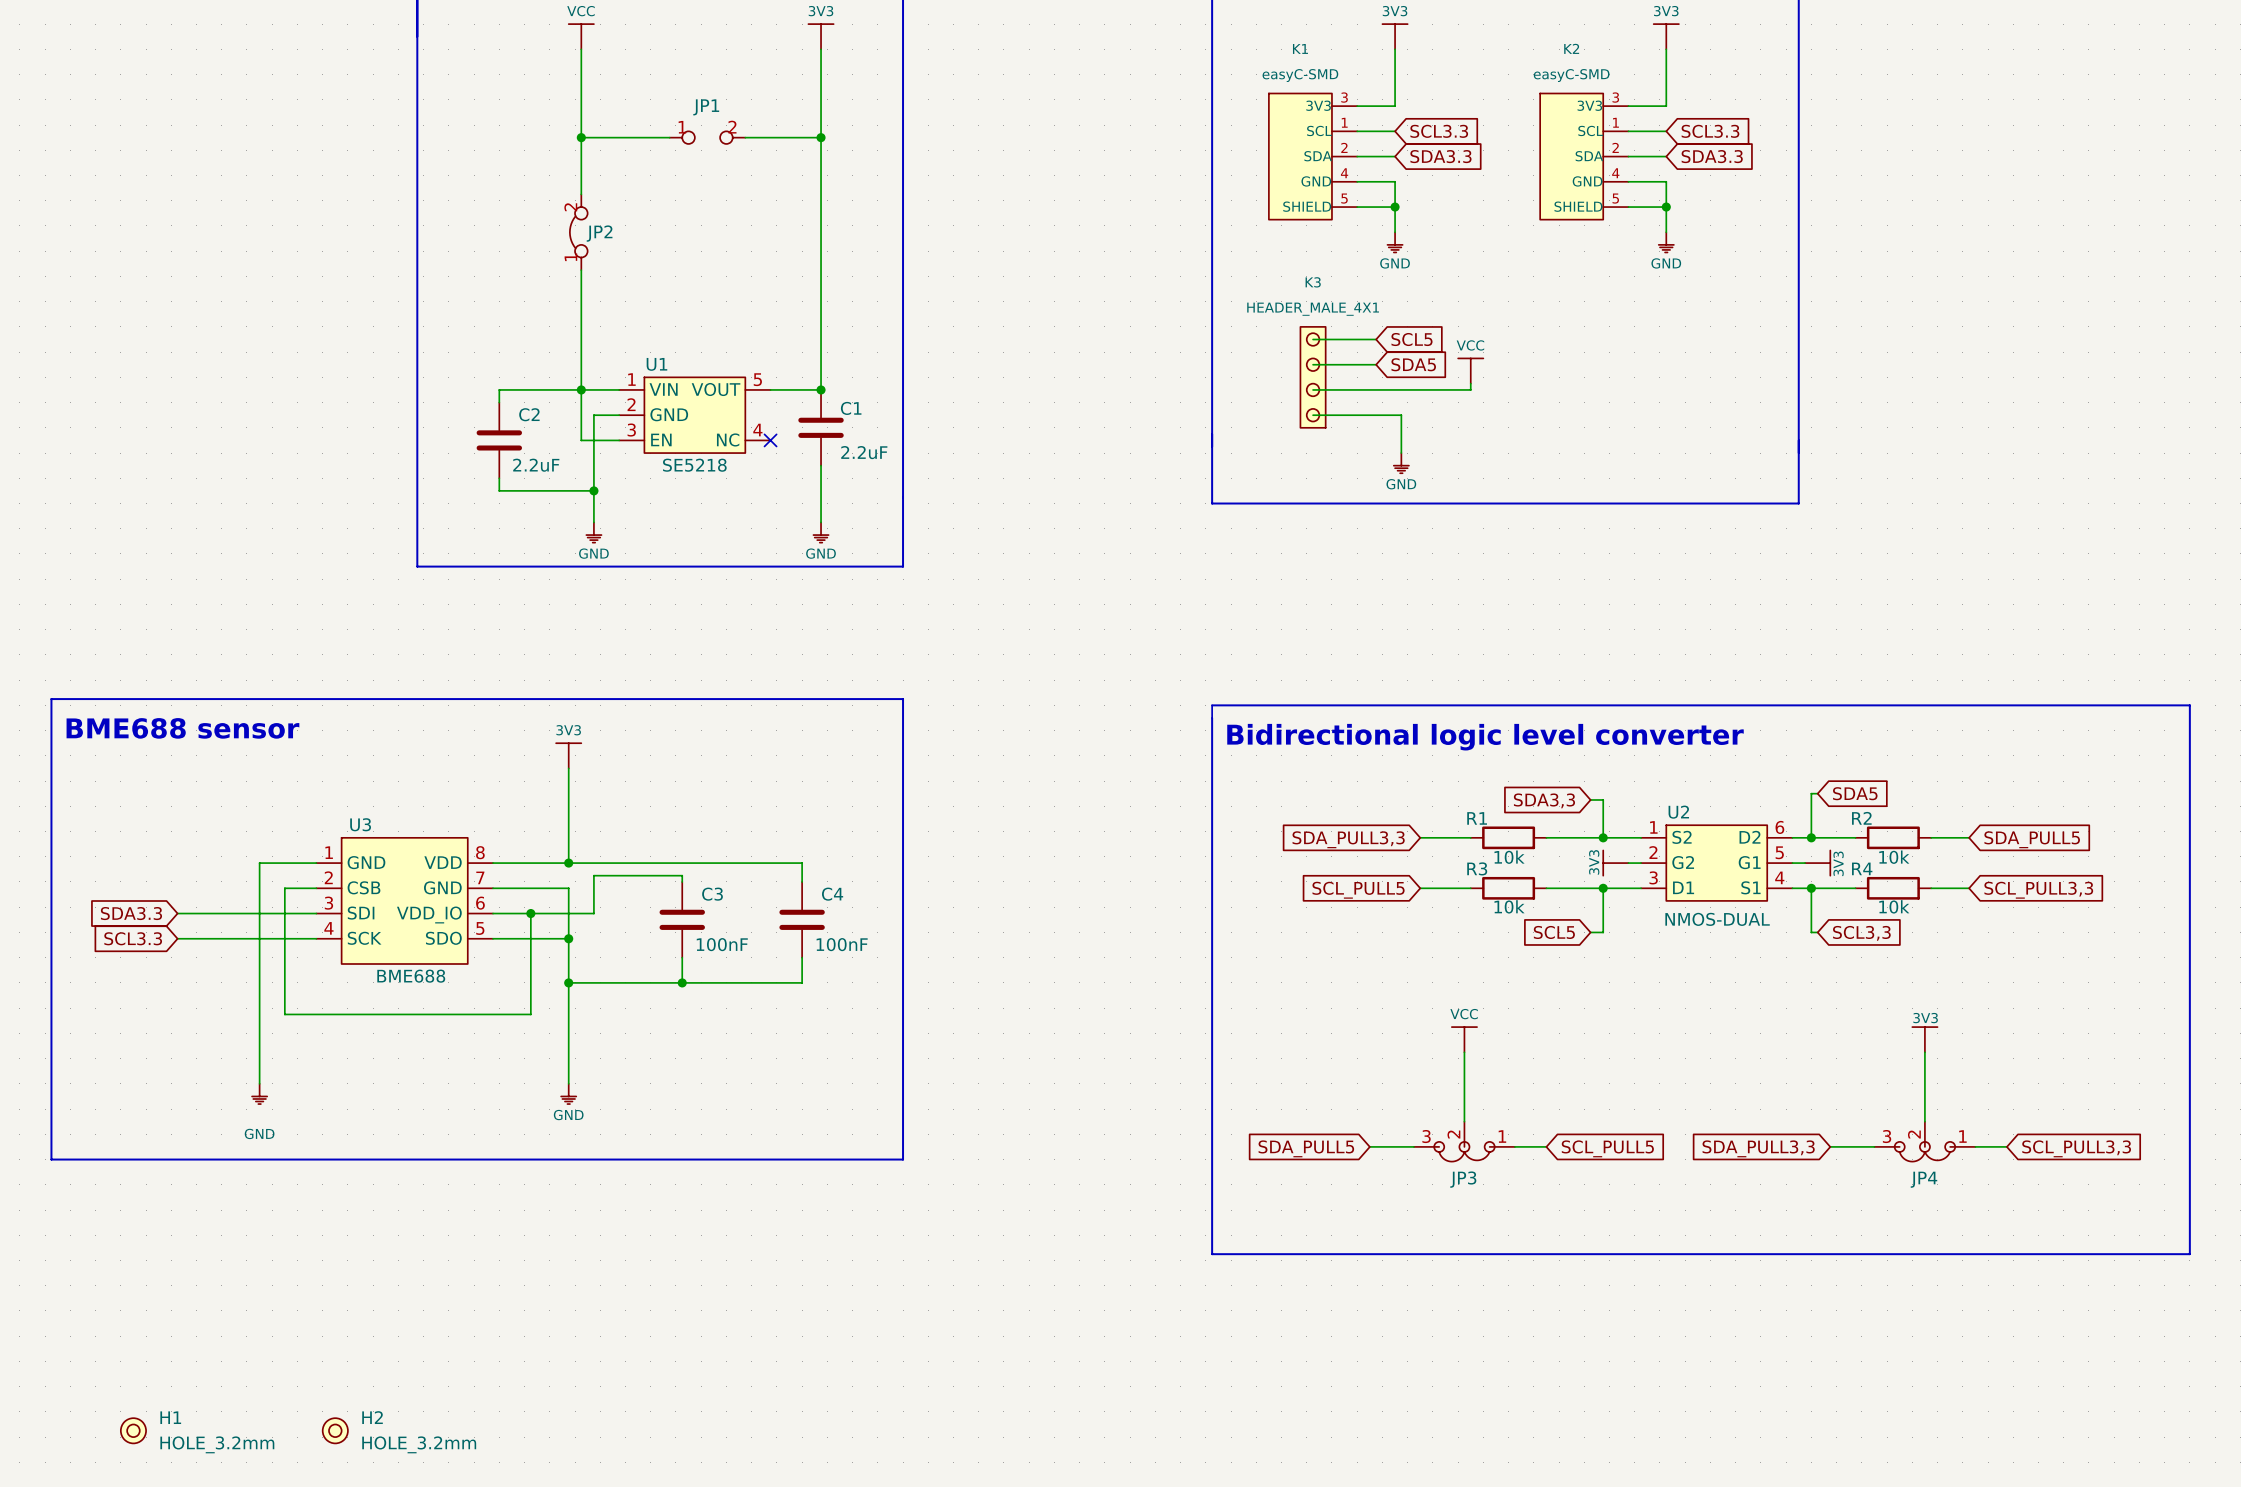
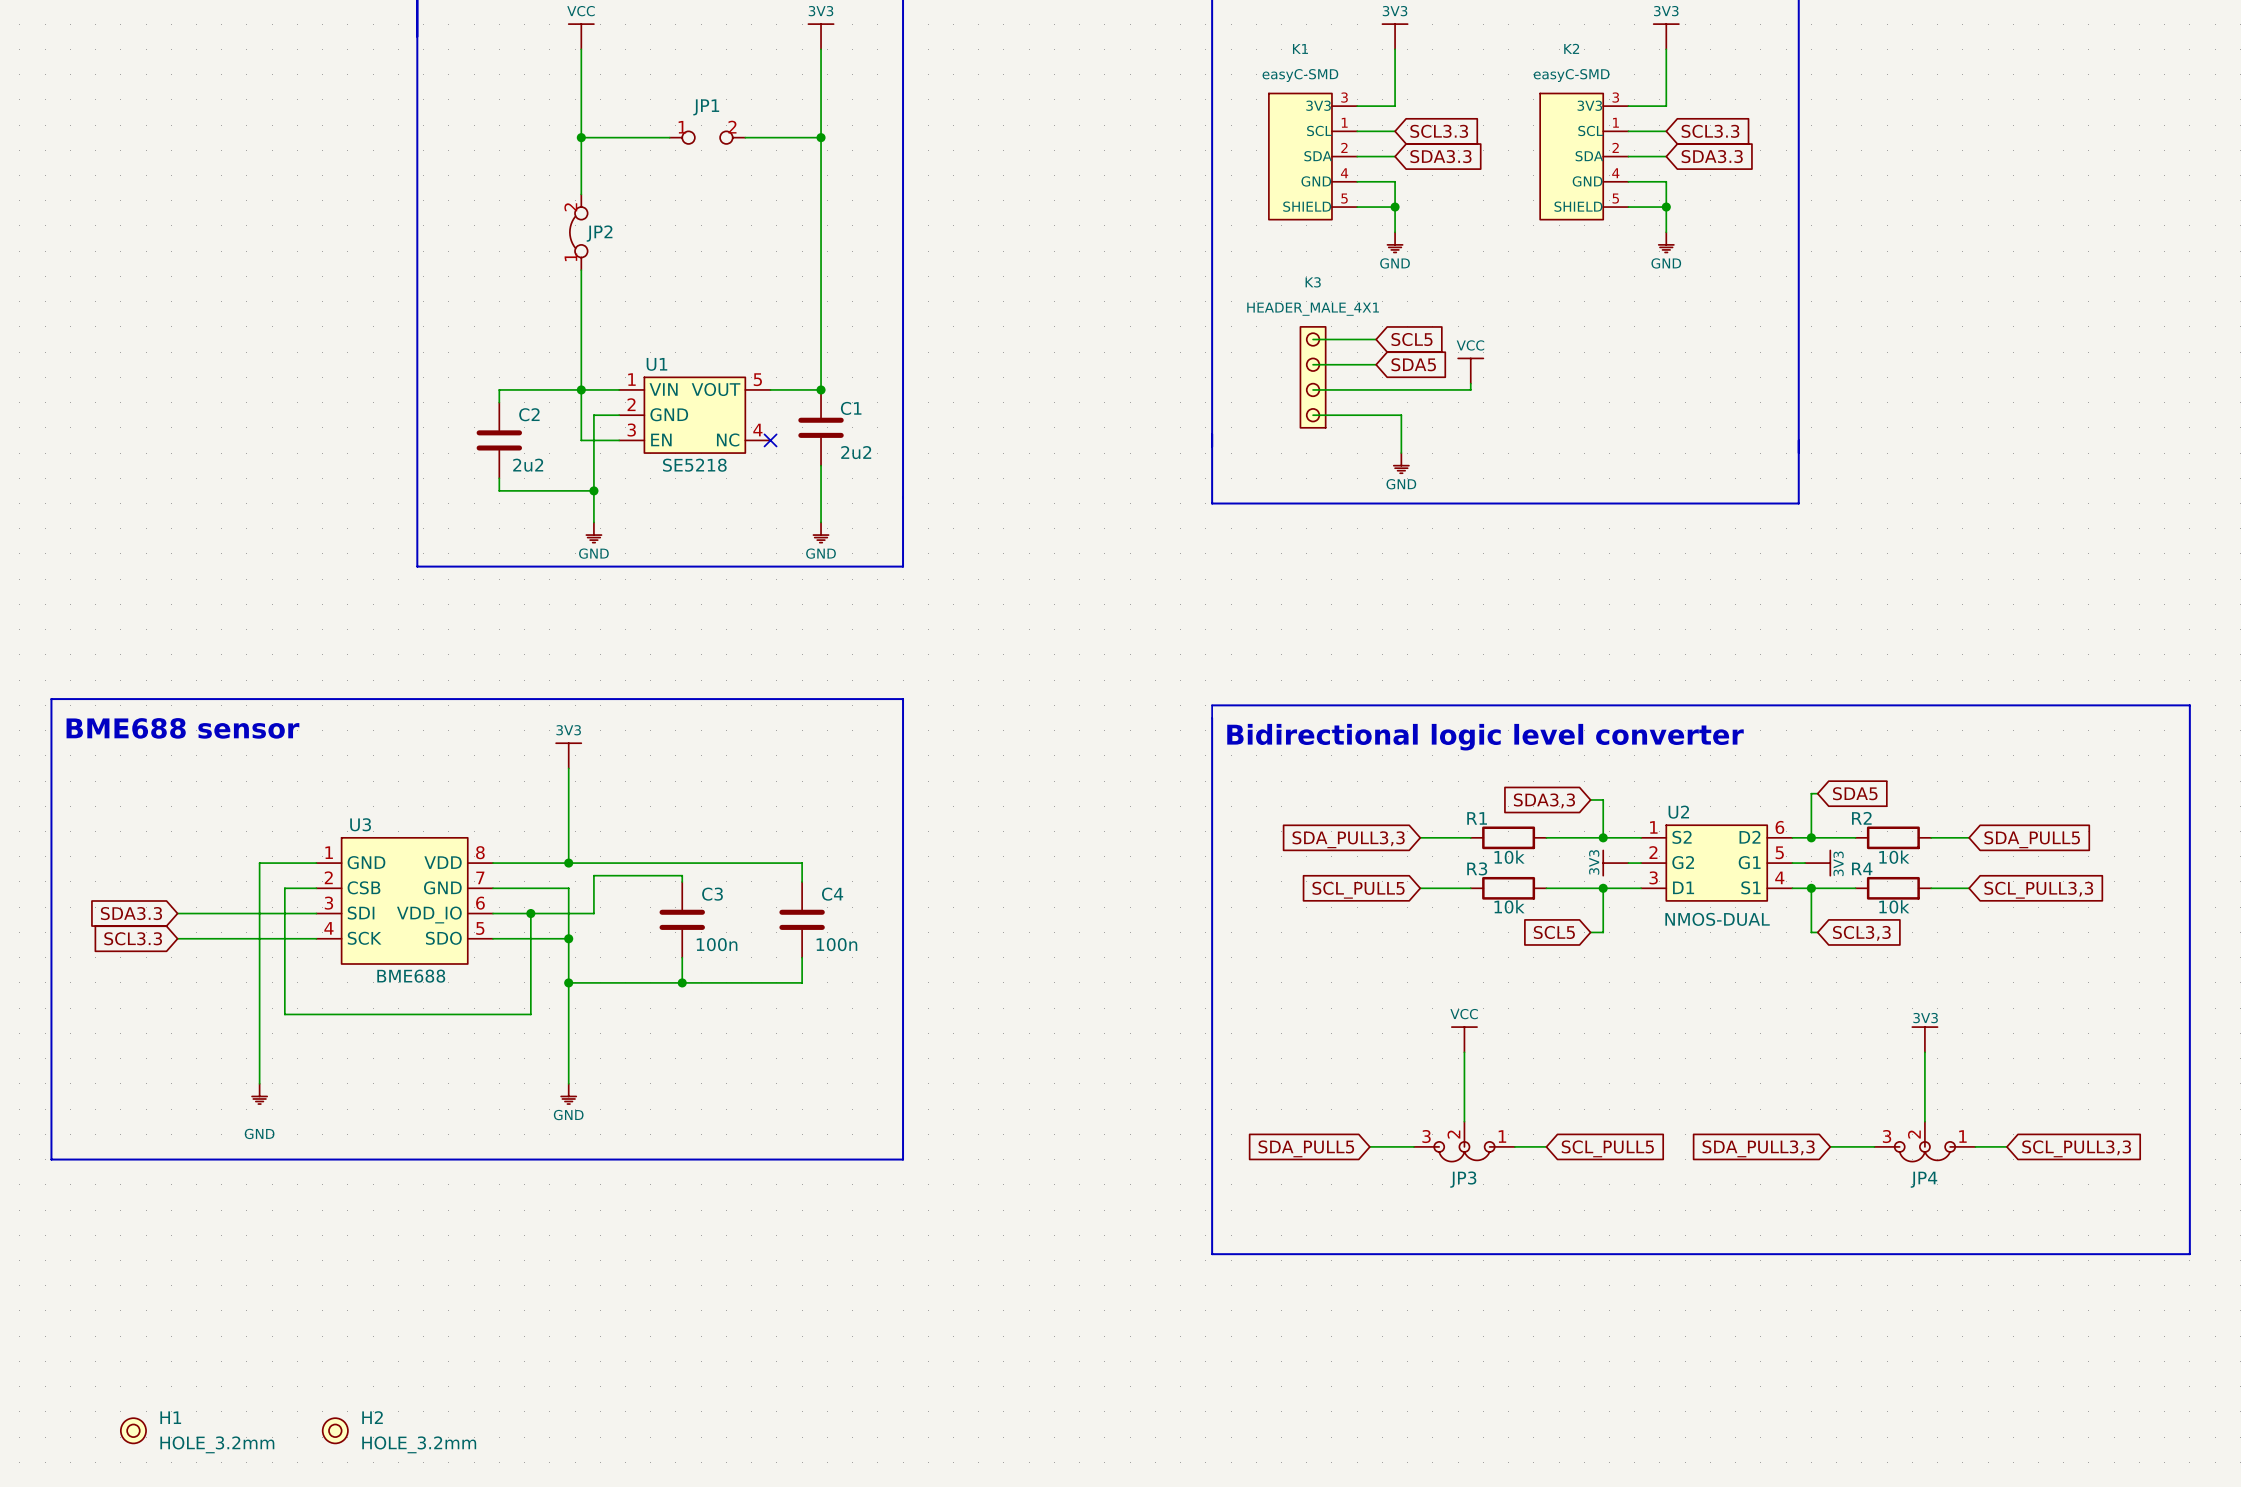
C1 value: 2.2uF (864, 452) -> 2u2 (856, 452)
C2 value: 2.2uF (536, 465) -> 2u2 (528, 465)
C3 value: 100nF (722, 944) -> 100n (717, 944)
C4 value: 100nF (842, 944) -> 100n (836, 944)

